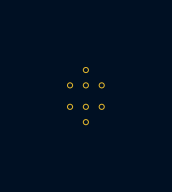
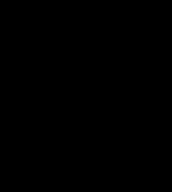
part: (85, 96) -> none

